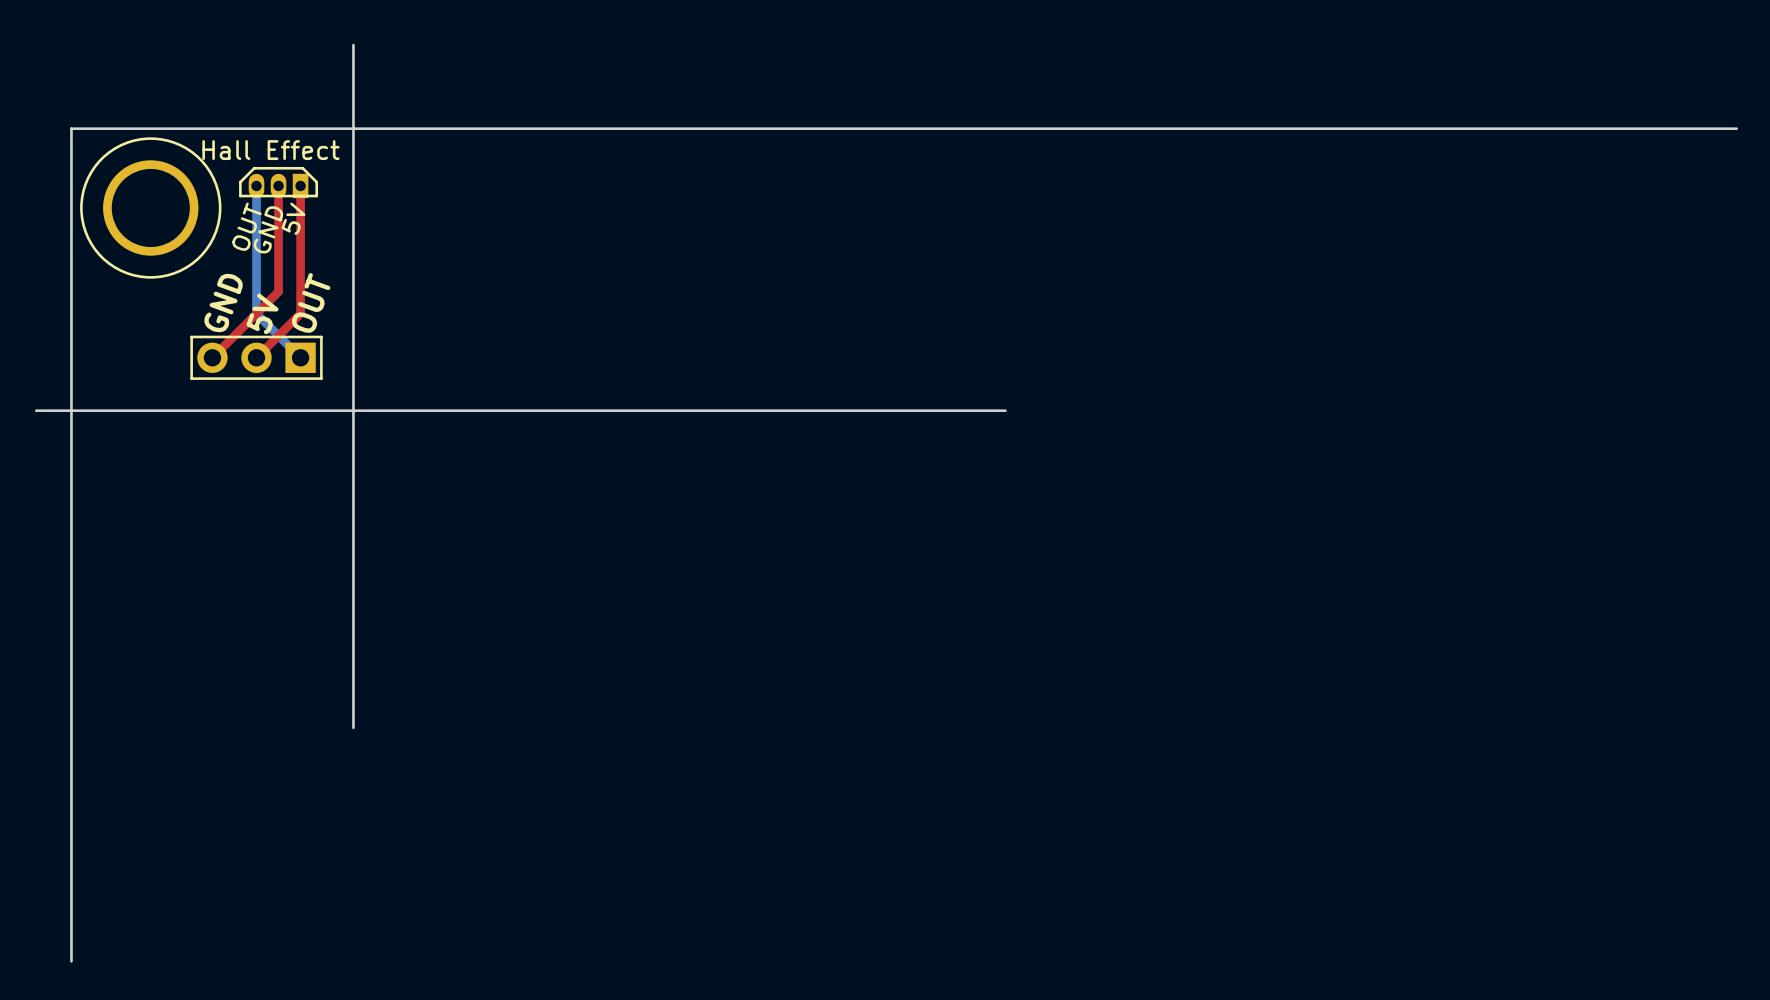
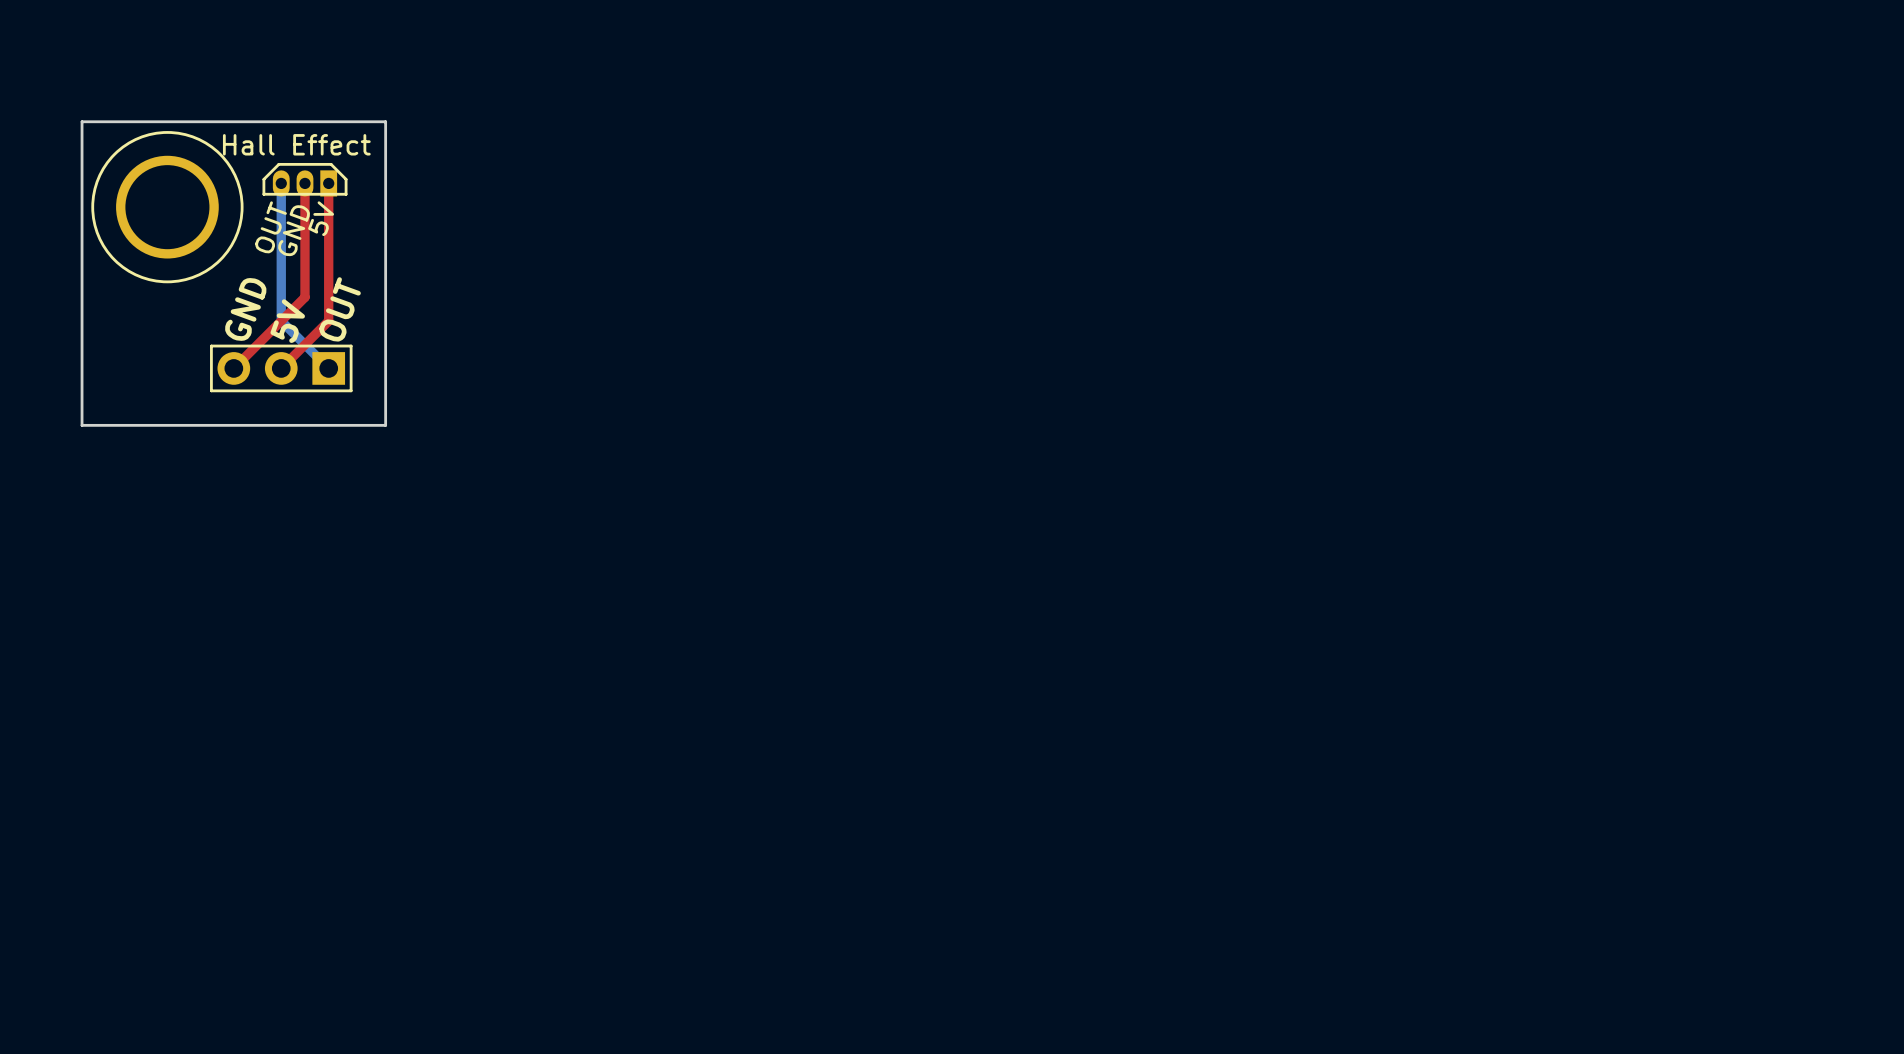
board edge: (353, 44) (353, 128) (1736, 128) -> none
board edge: (36, 410) (71, 410) (71, 961) -> none
board edge: (1005, 410) (353, 410) (353, 727) -> none

